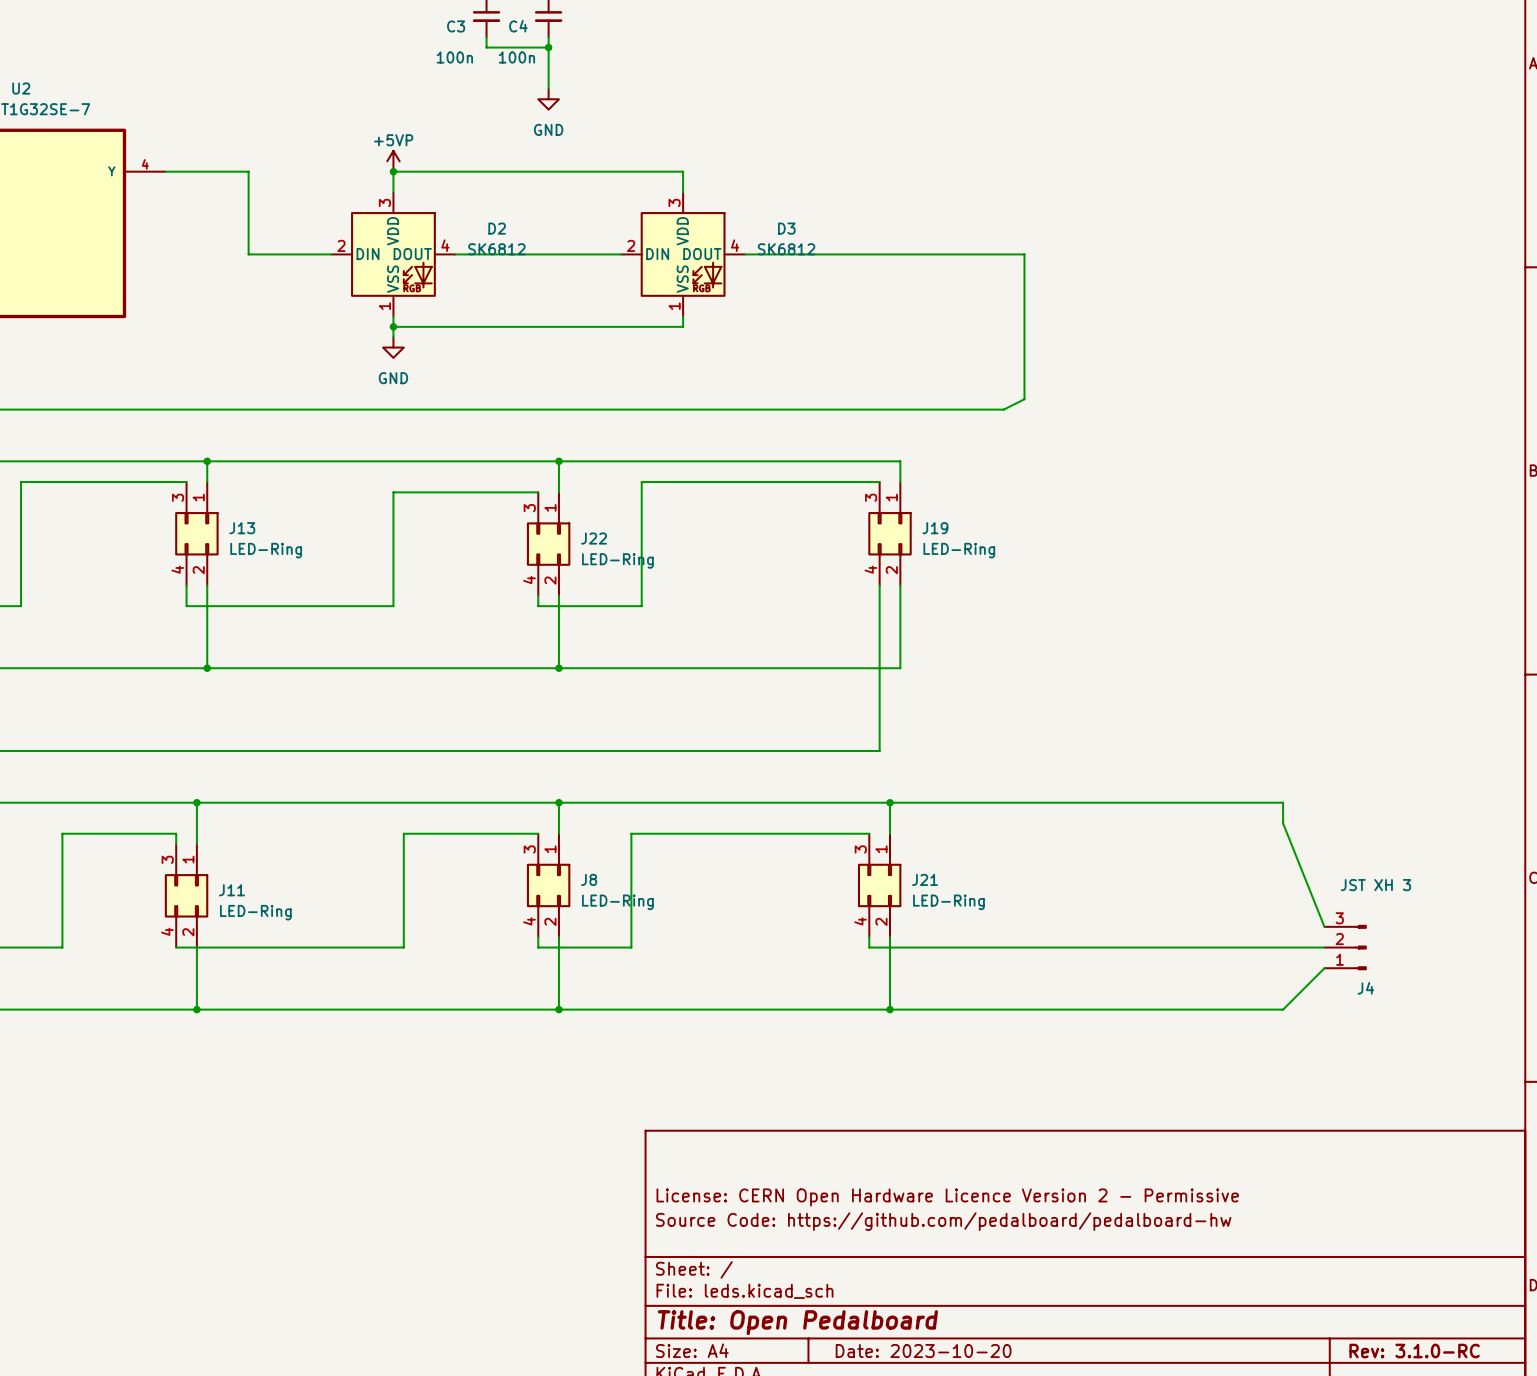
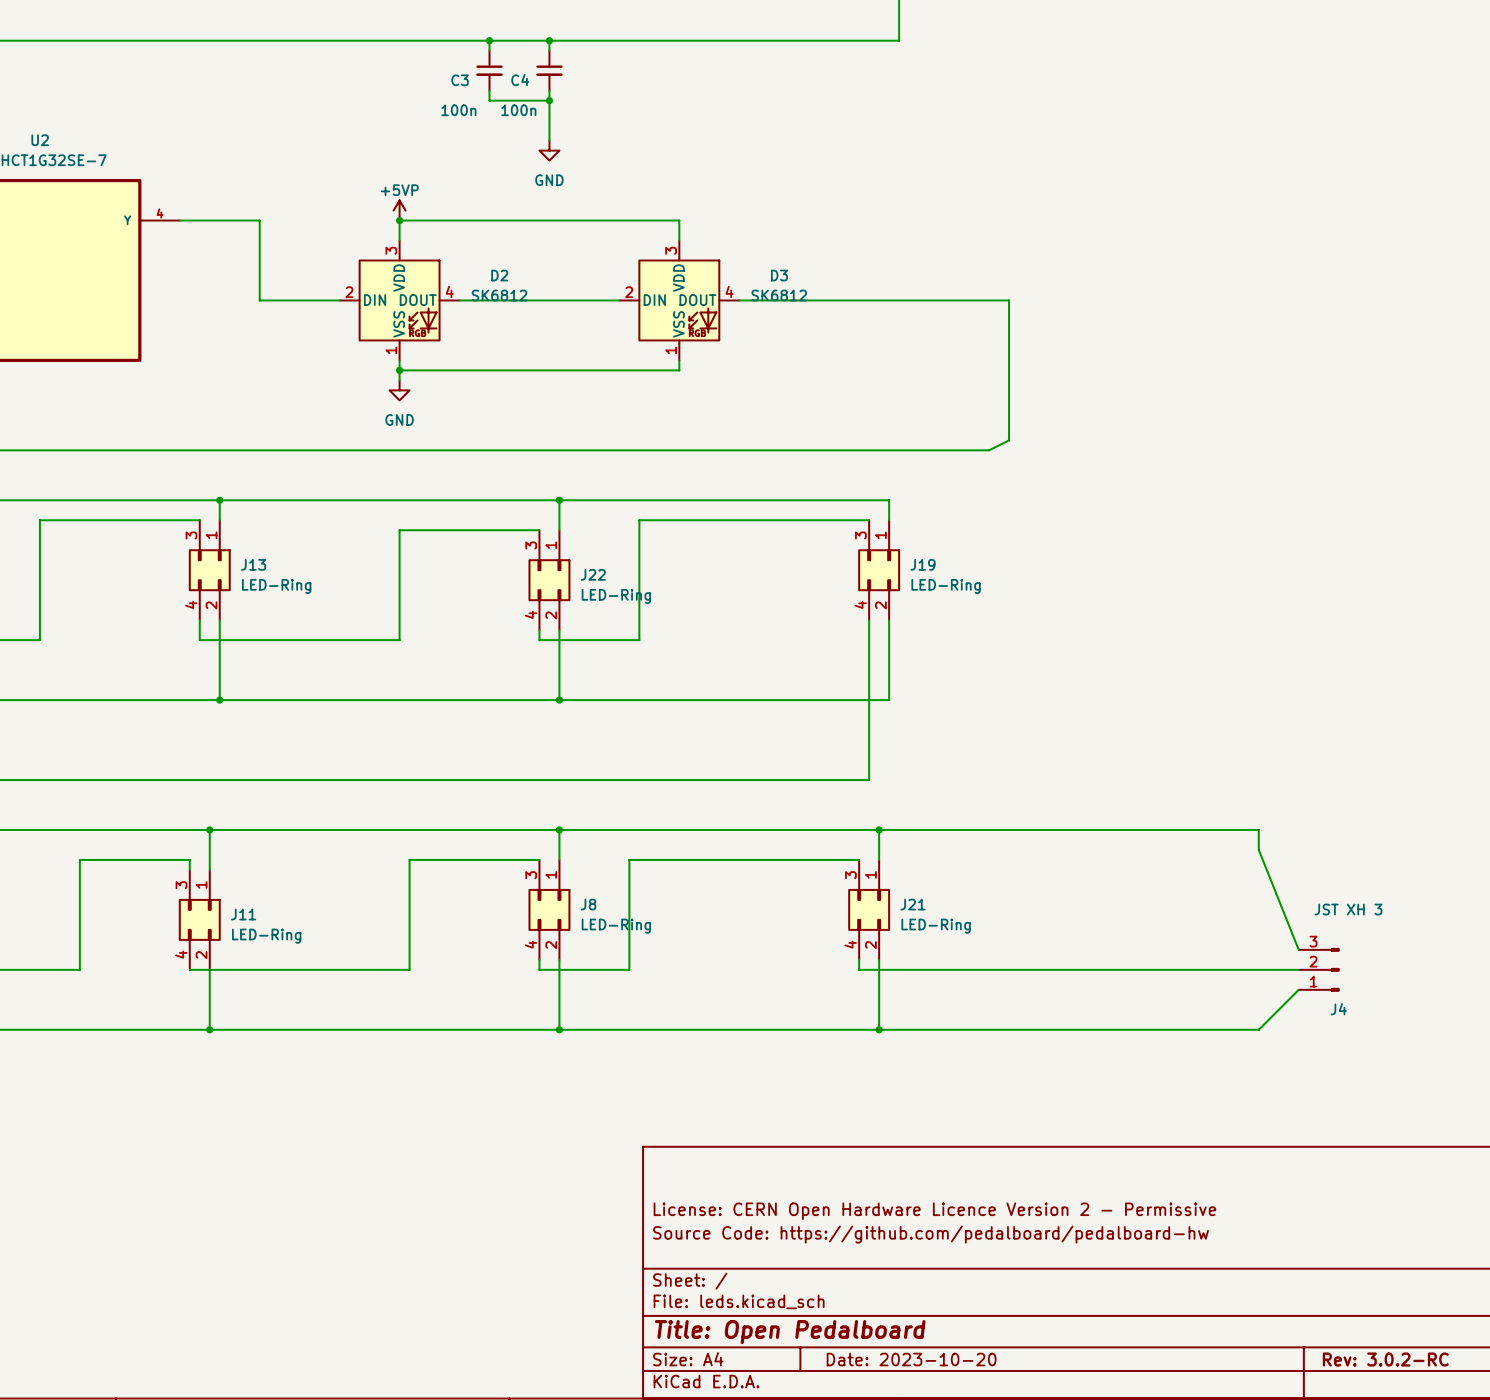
title block: Rev: 3.1.0-RC (1414, 1351) -> Rev: 3.0.2-RC (1385, 1359)

